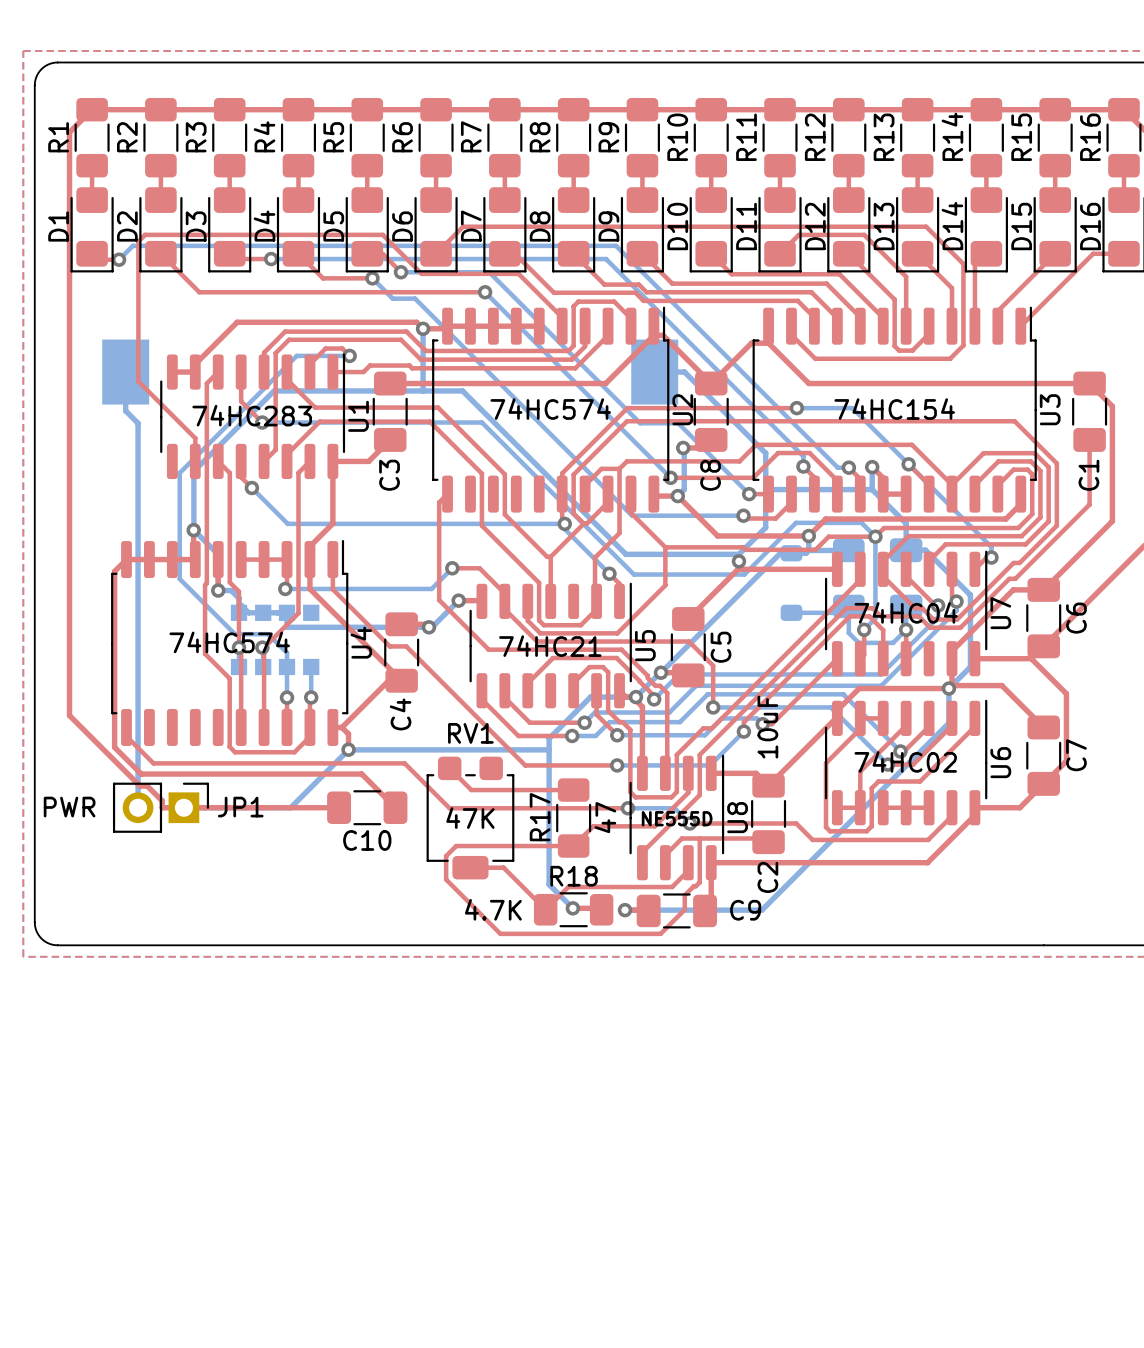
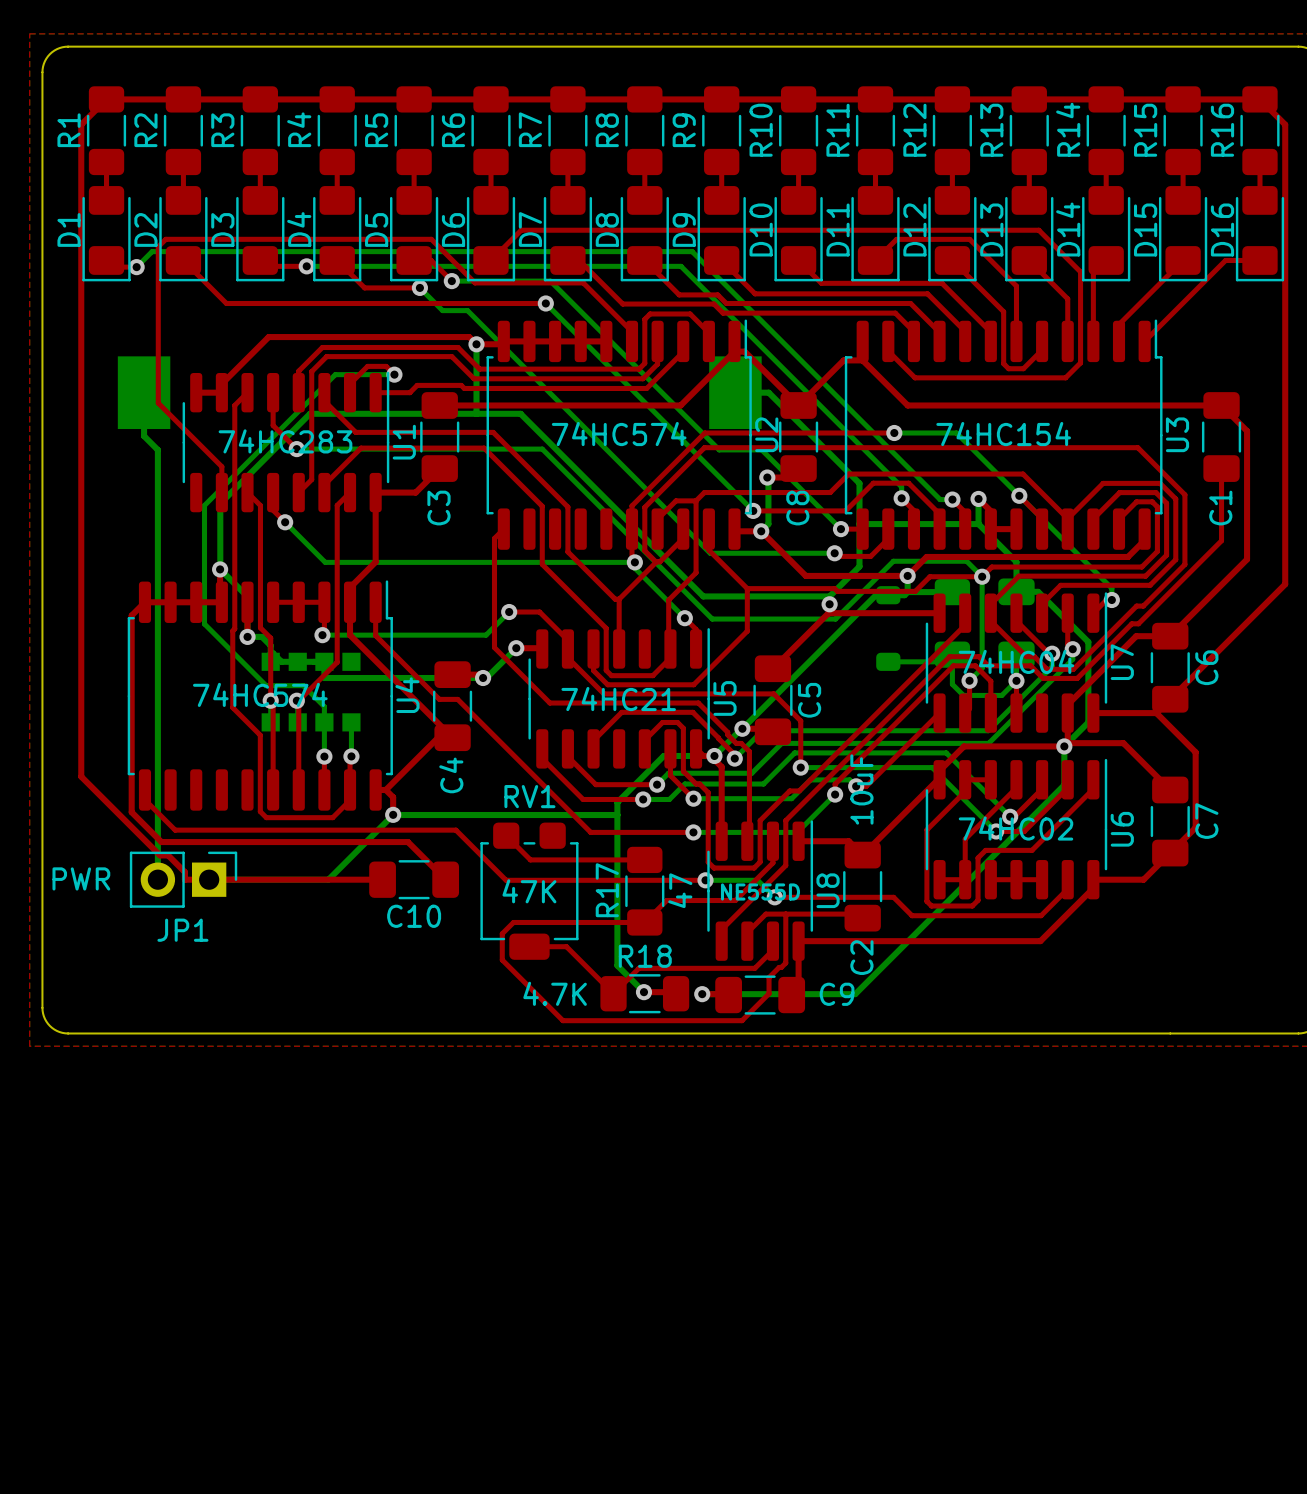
JP1 name position: JP1 (240, 807) -> JP1 (182, 930)

